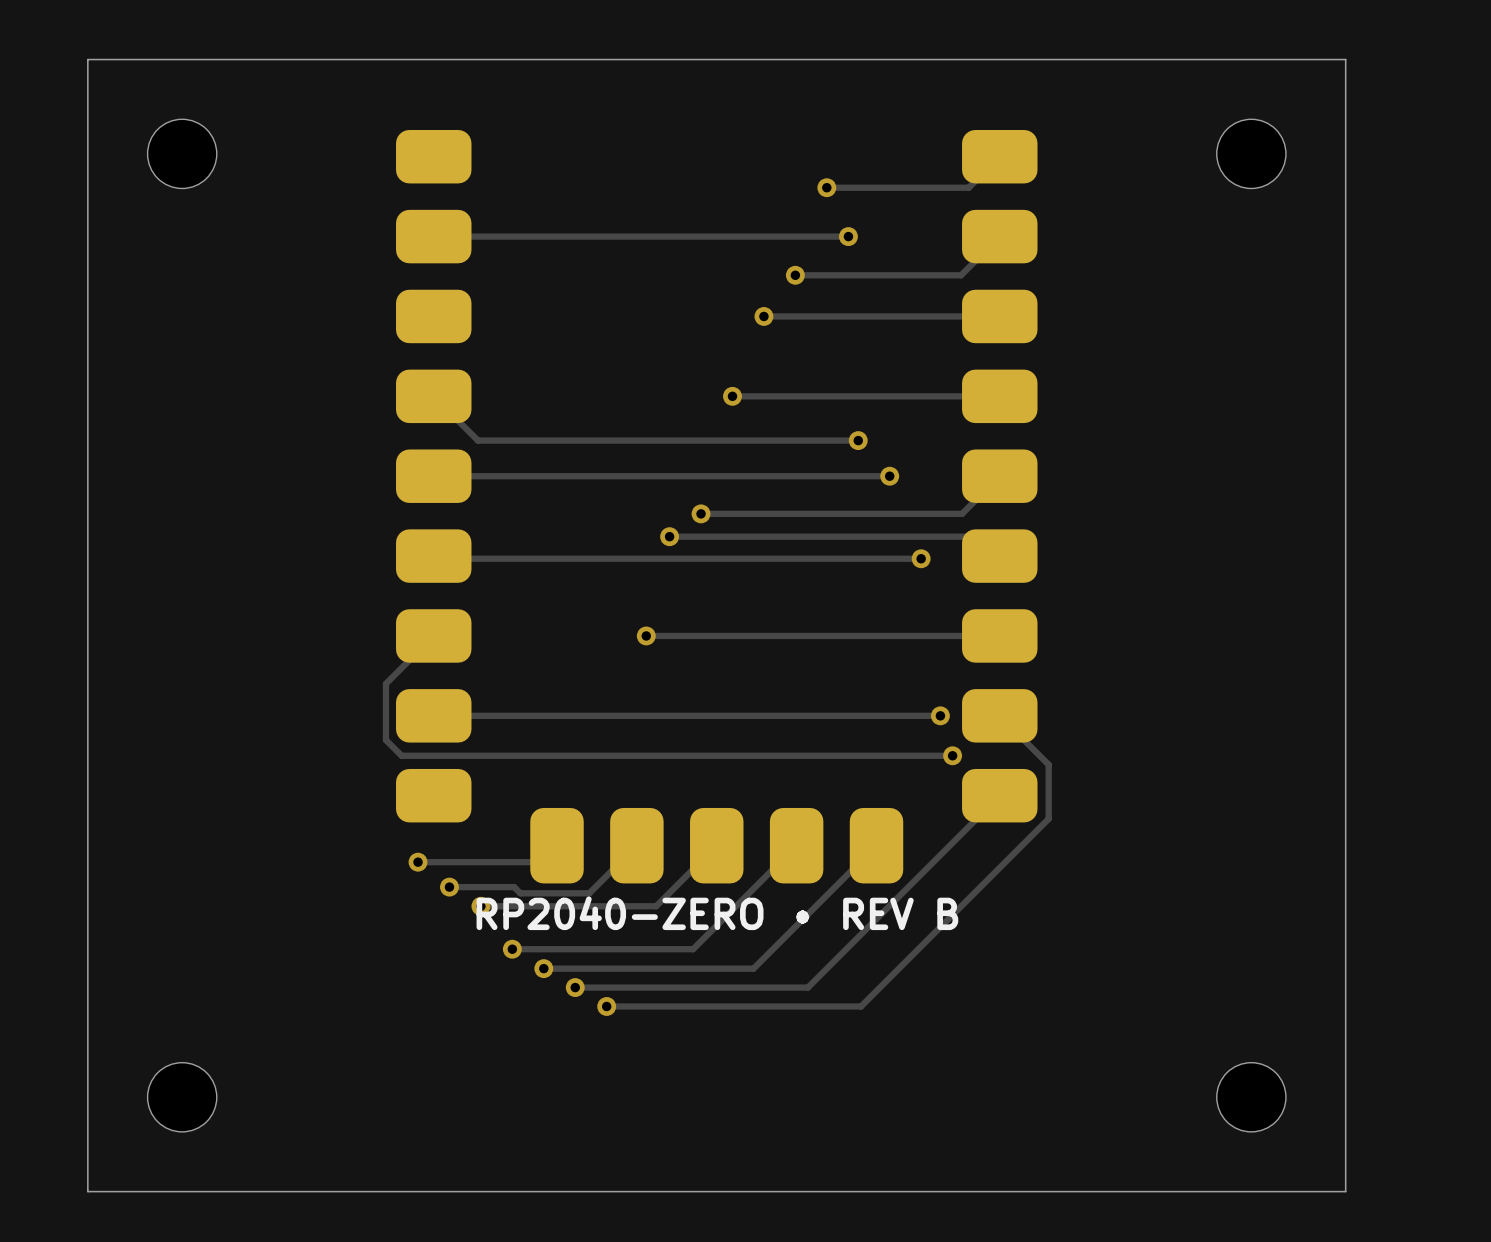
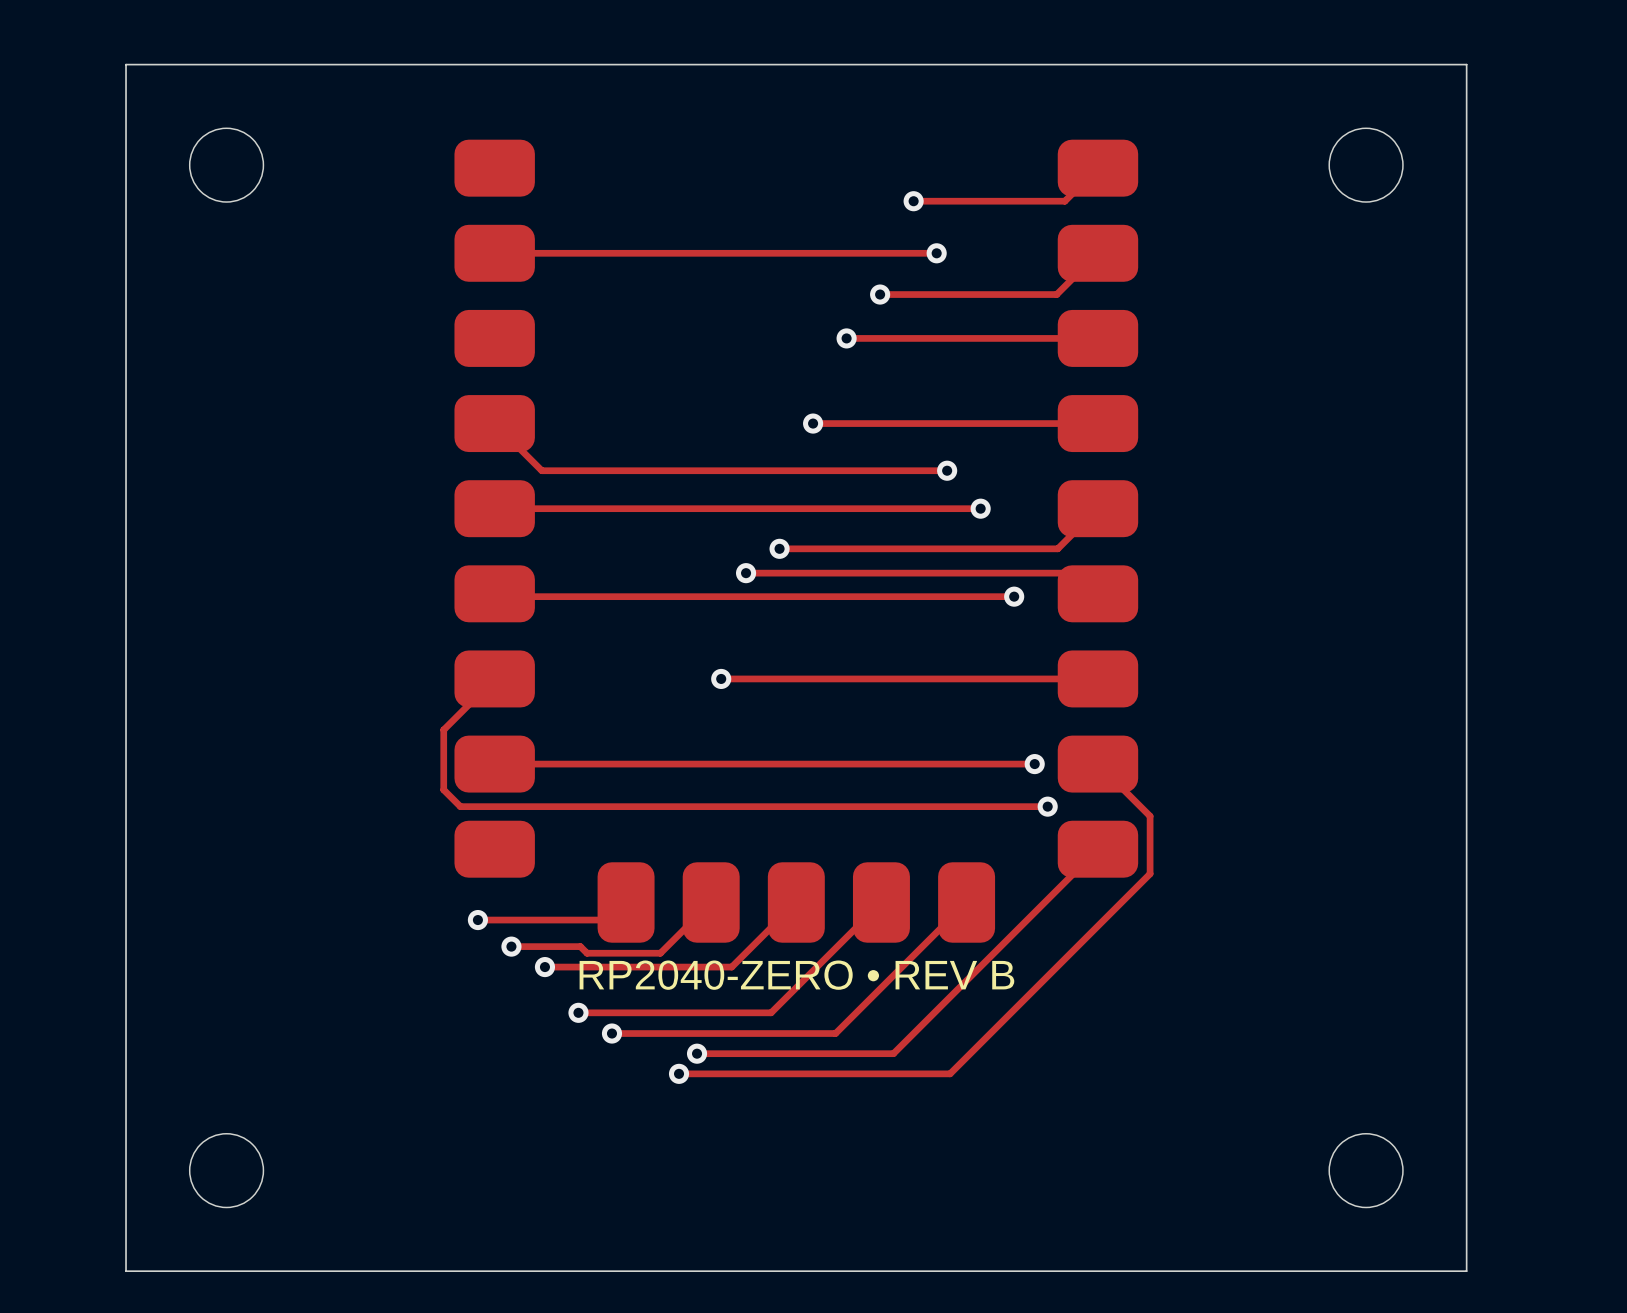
track: (575, 987) (623, 987) -> none
via position: (575, 987) -> (697, 1053)

